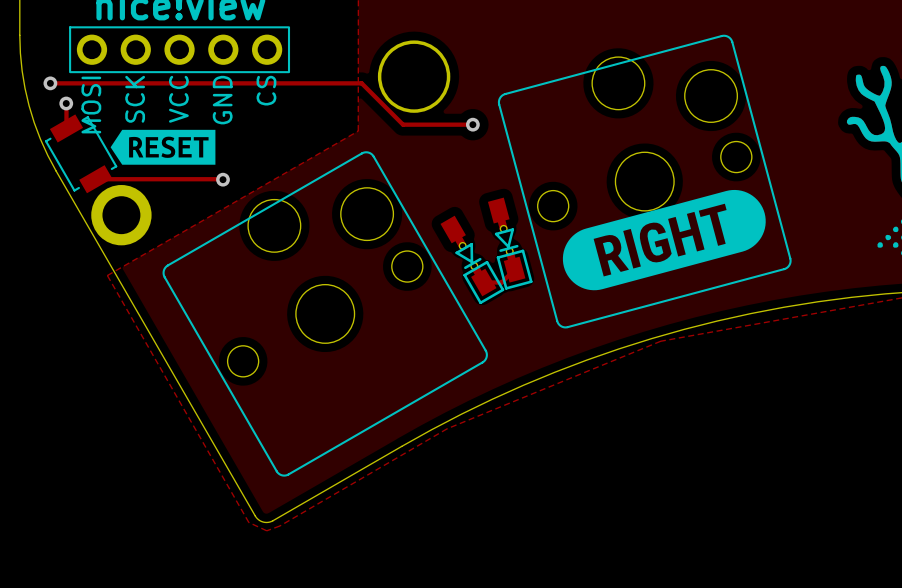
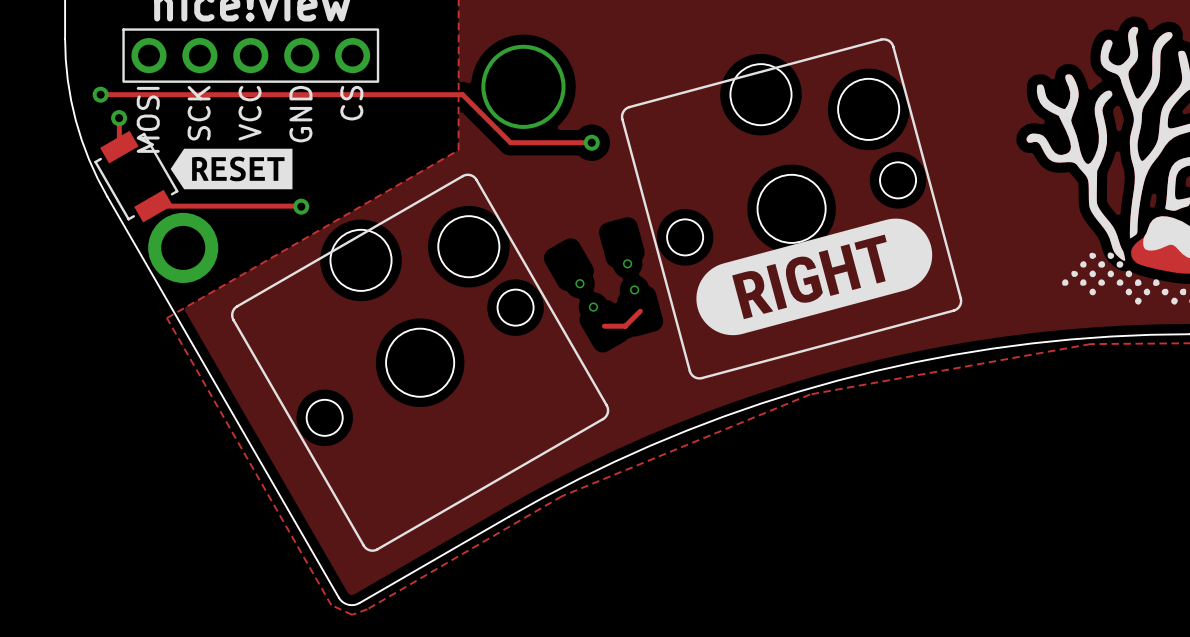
part footprint: [487, 197, 533, 290] -> [623, 259, 640, 295]
part footprint: [440, 215, 505, 305] -> [575, 279, 599, 312]

